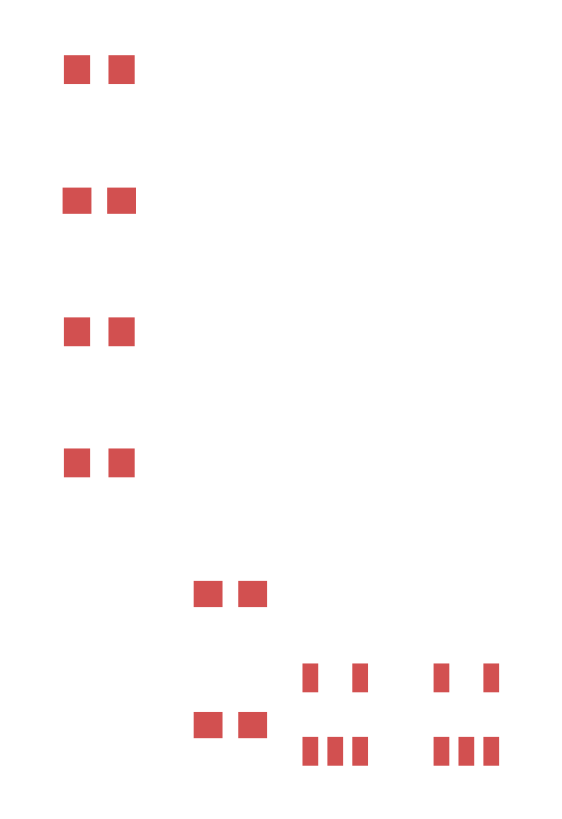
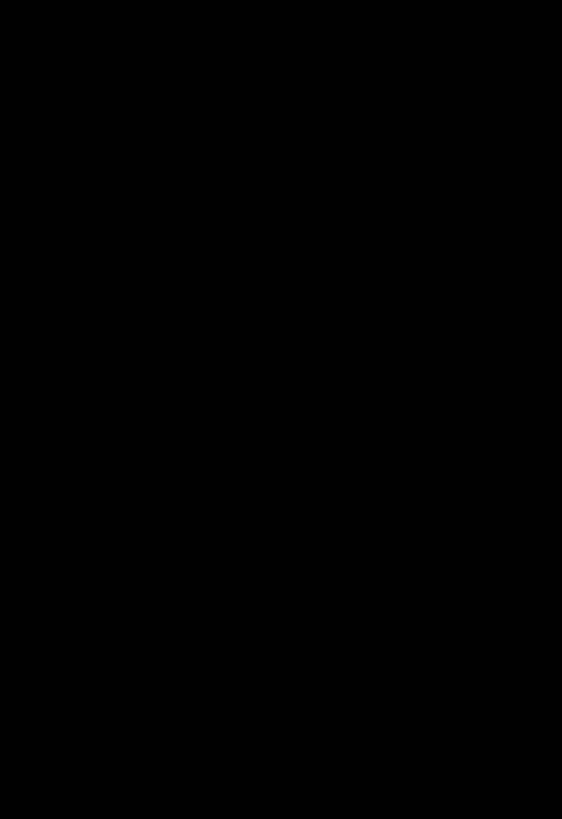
part: (99, 69) -> none
part: (99, 200) -> none
part: (99, 331) -> none
part: (99, 462) -> none
part: (230, 593) -> none
part: (335, 714) -> none
part: (466, 714) -> none
part: (230, 725) -> none

